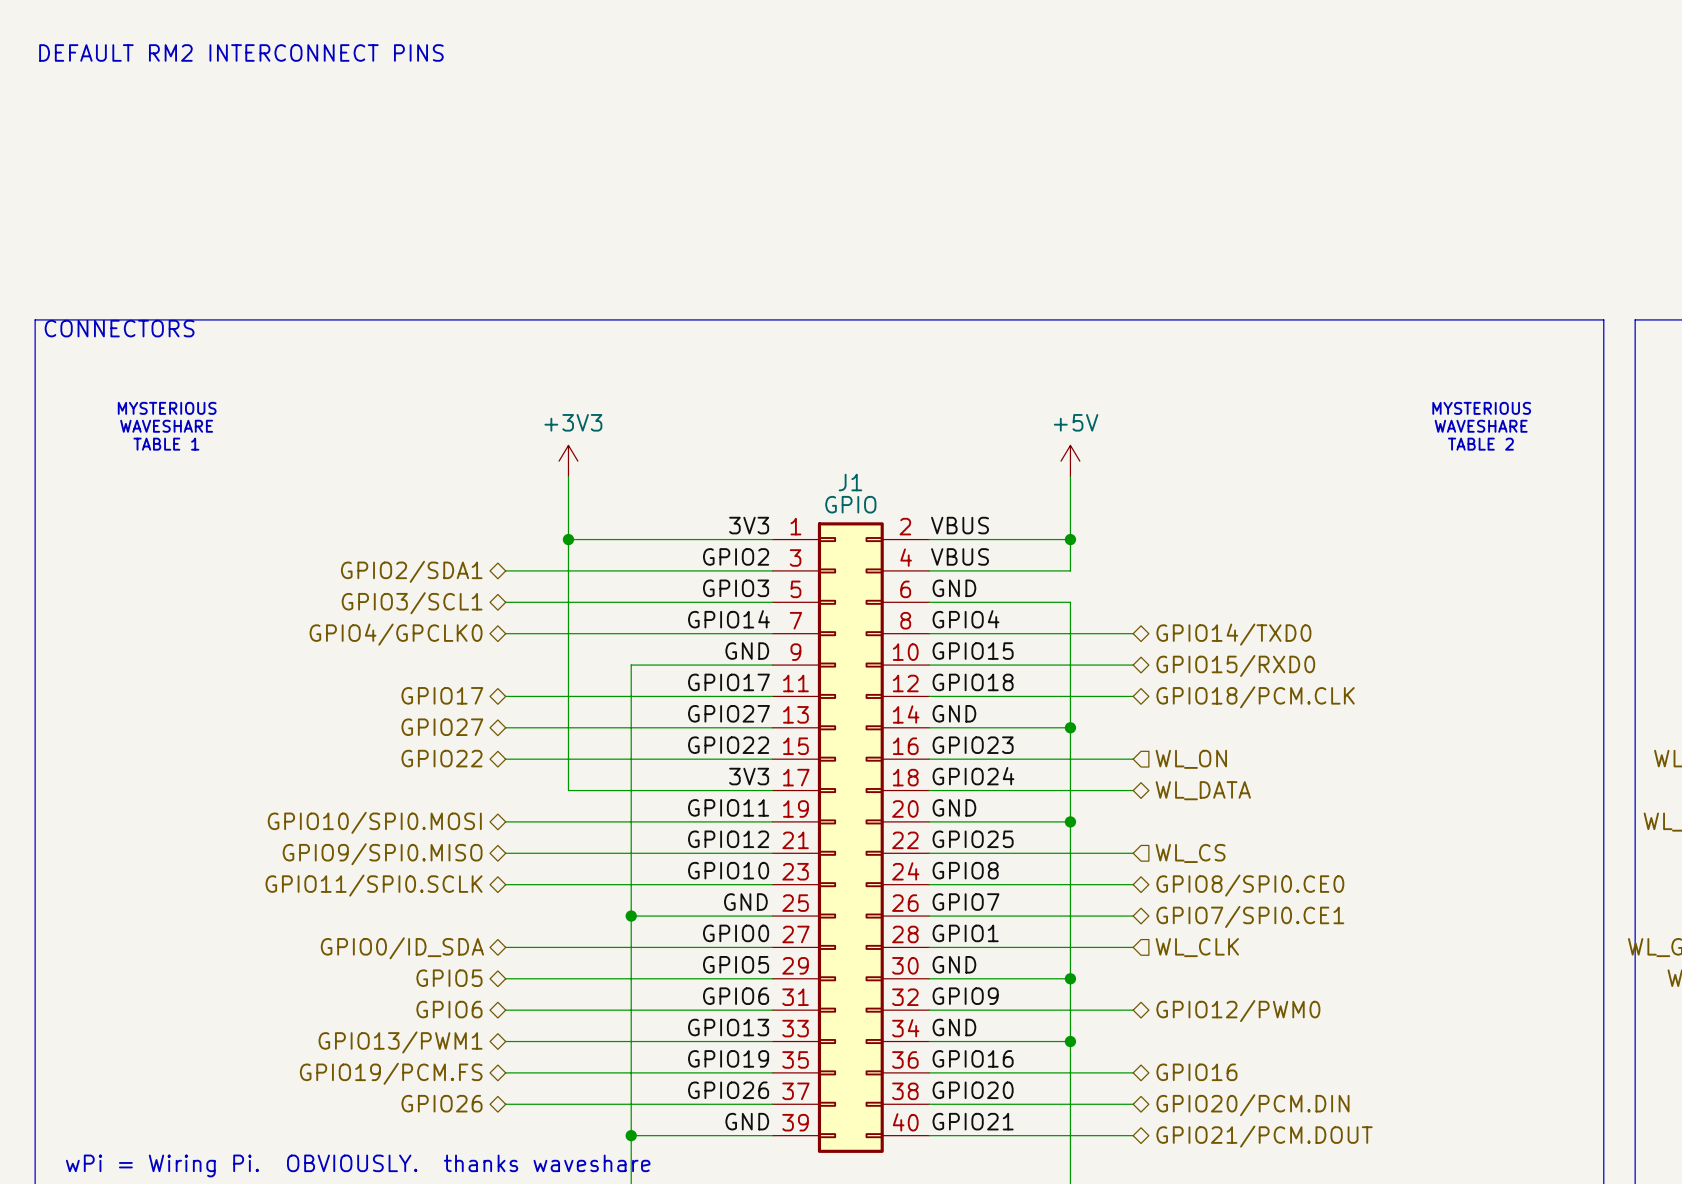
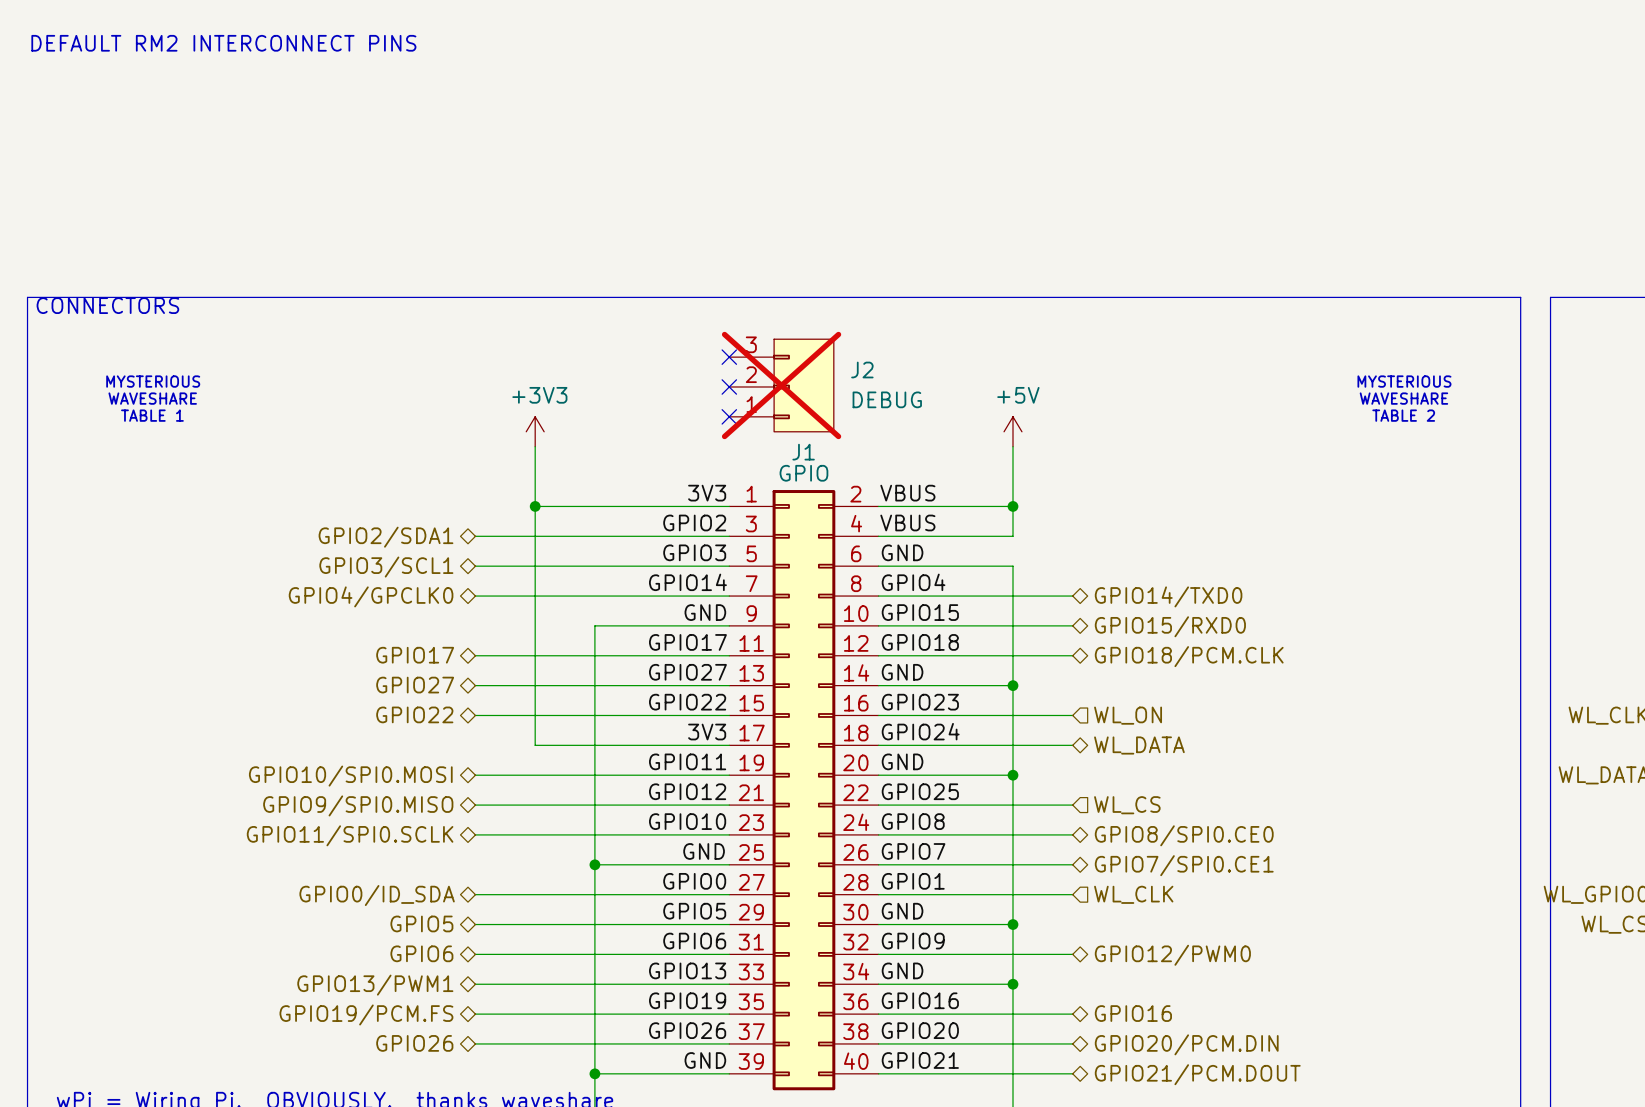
no-connect mark: none -> (729, 357)
J2: none -> DEBUG (781, 385)
no-connect mark: none -> (729, 386)
no-connect mark: none -> (729, 416)

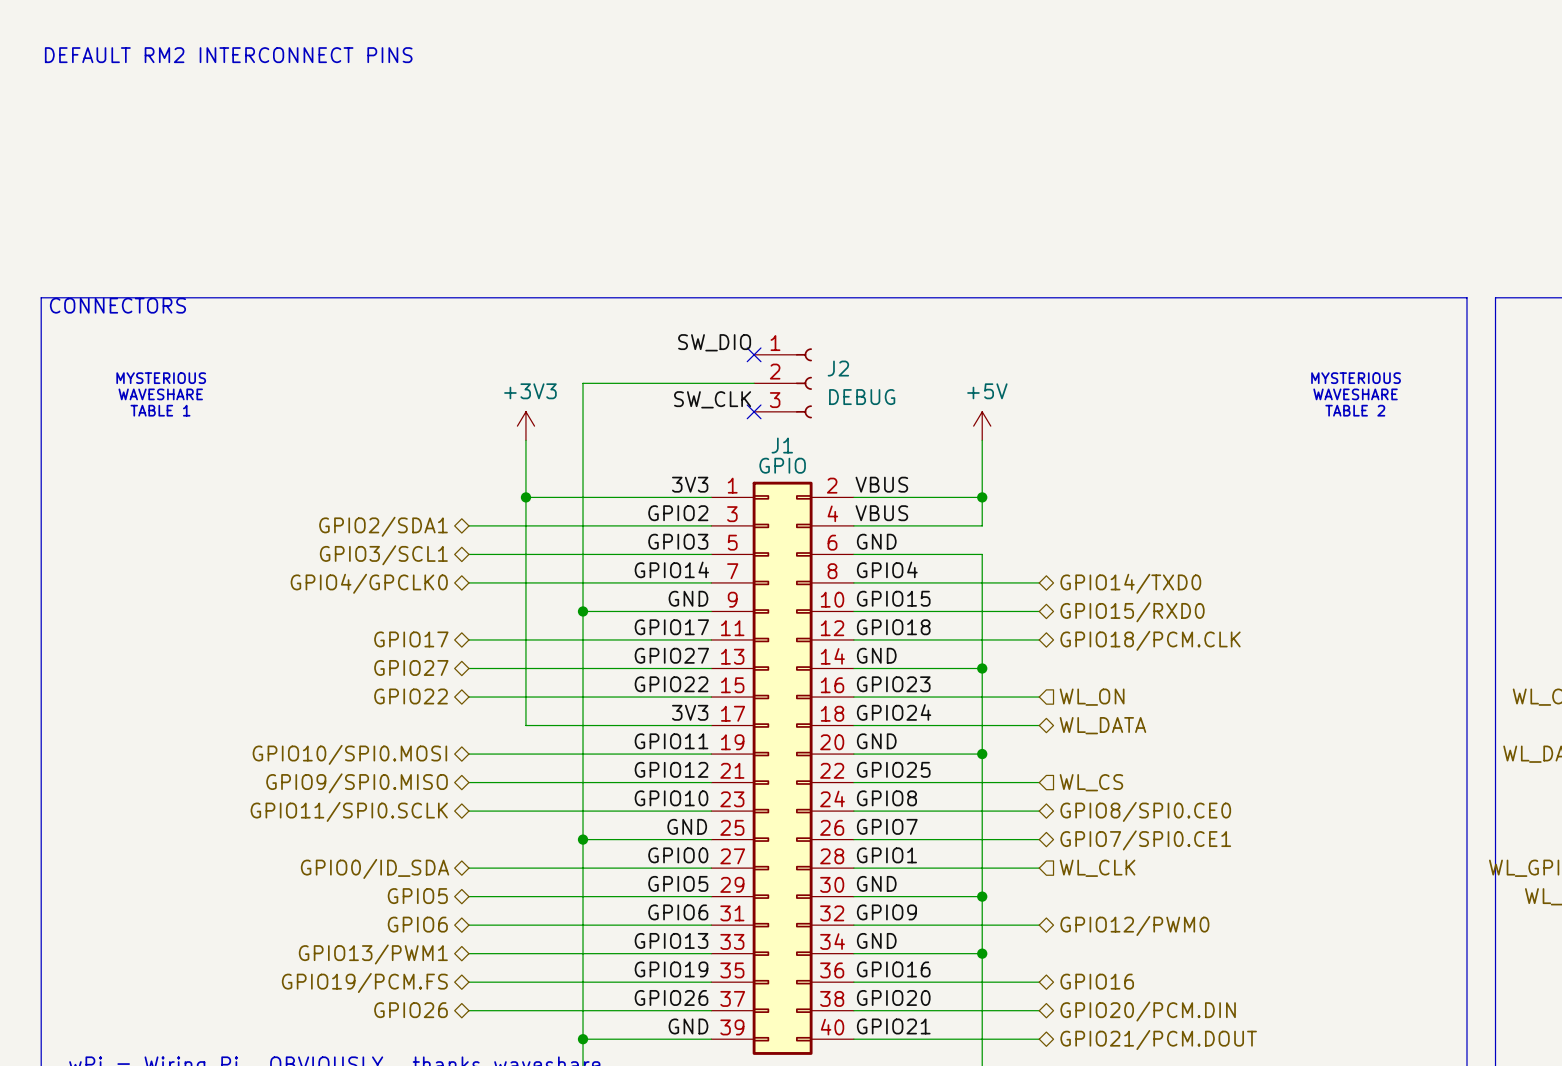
J2 symbol: [729, 339, 834, 432] -> [754, 348, 812, 419]
label: none -> SW_DIO (714, 342)
no-connect mark: (729, 357) -> none
no-connect mark: none -> (754, 354)
J2 do-not-place cross: (781, 385) -> none
no-connect mark: (729, 386) -> none
wire: none -> (754, 383) (583, 383) (583, 611)
label: none -> SW_CLK (712, 399)
no-connect mark: (729, 416) -> none
no-connect mark: none -> (754, 411)
junction: none -> (583, 611)

